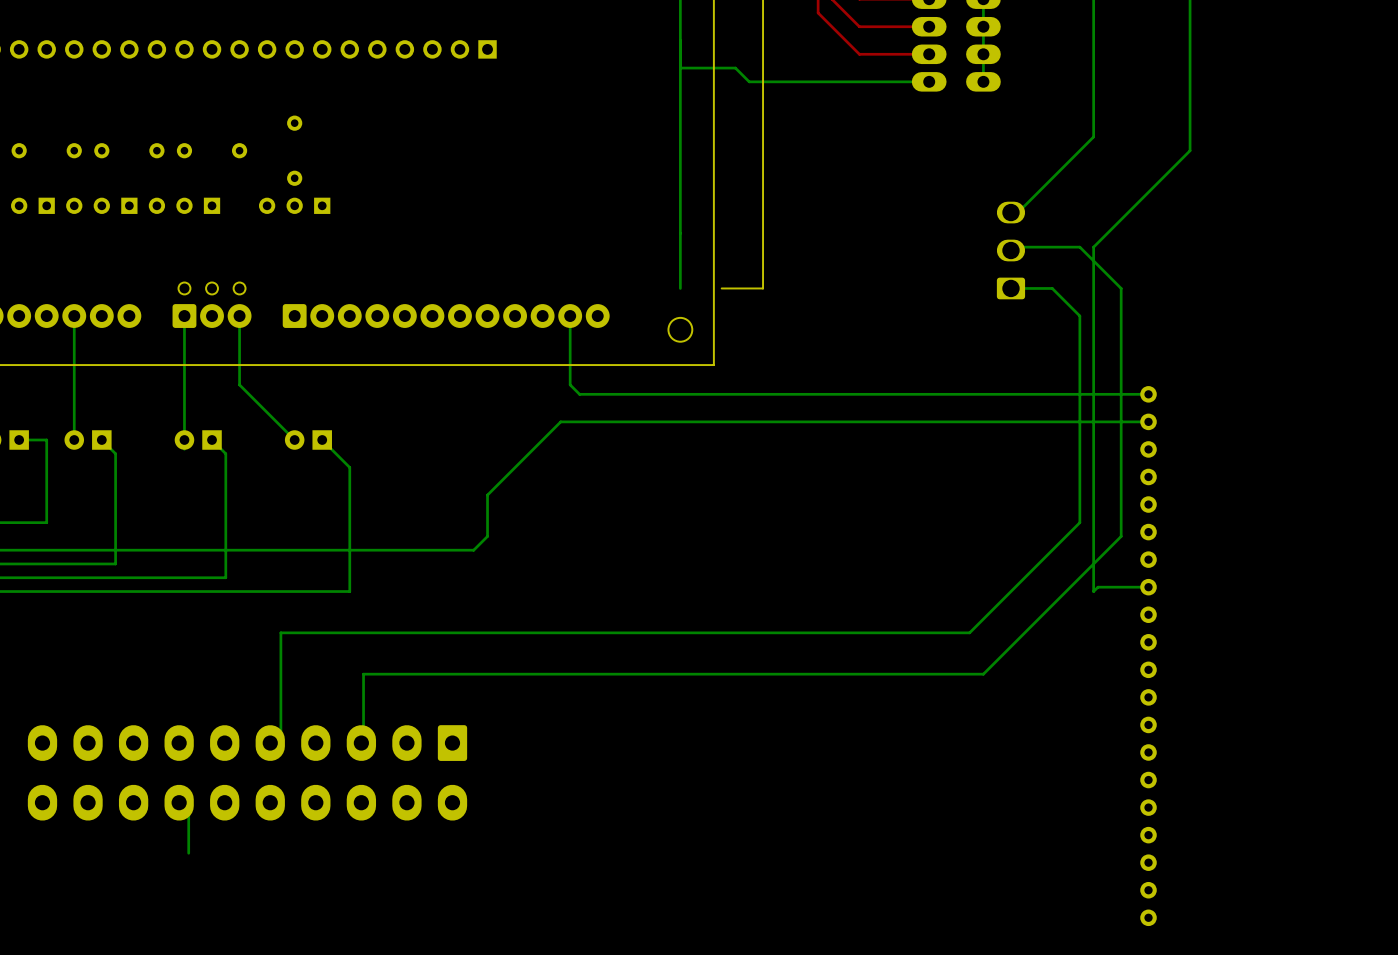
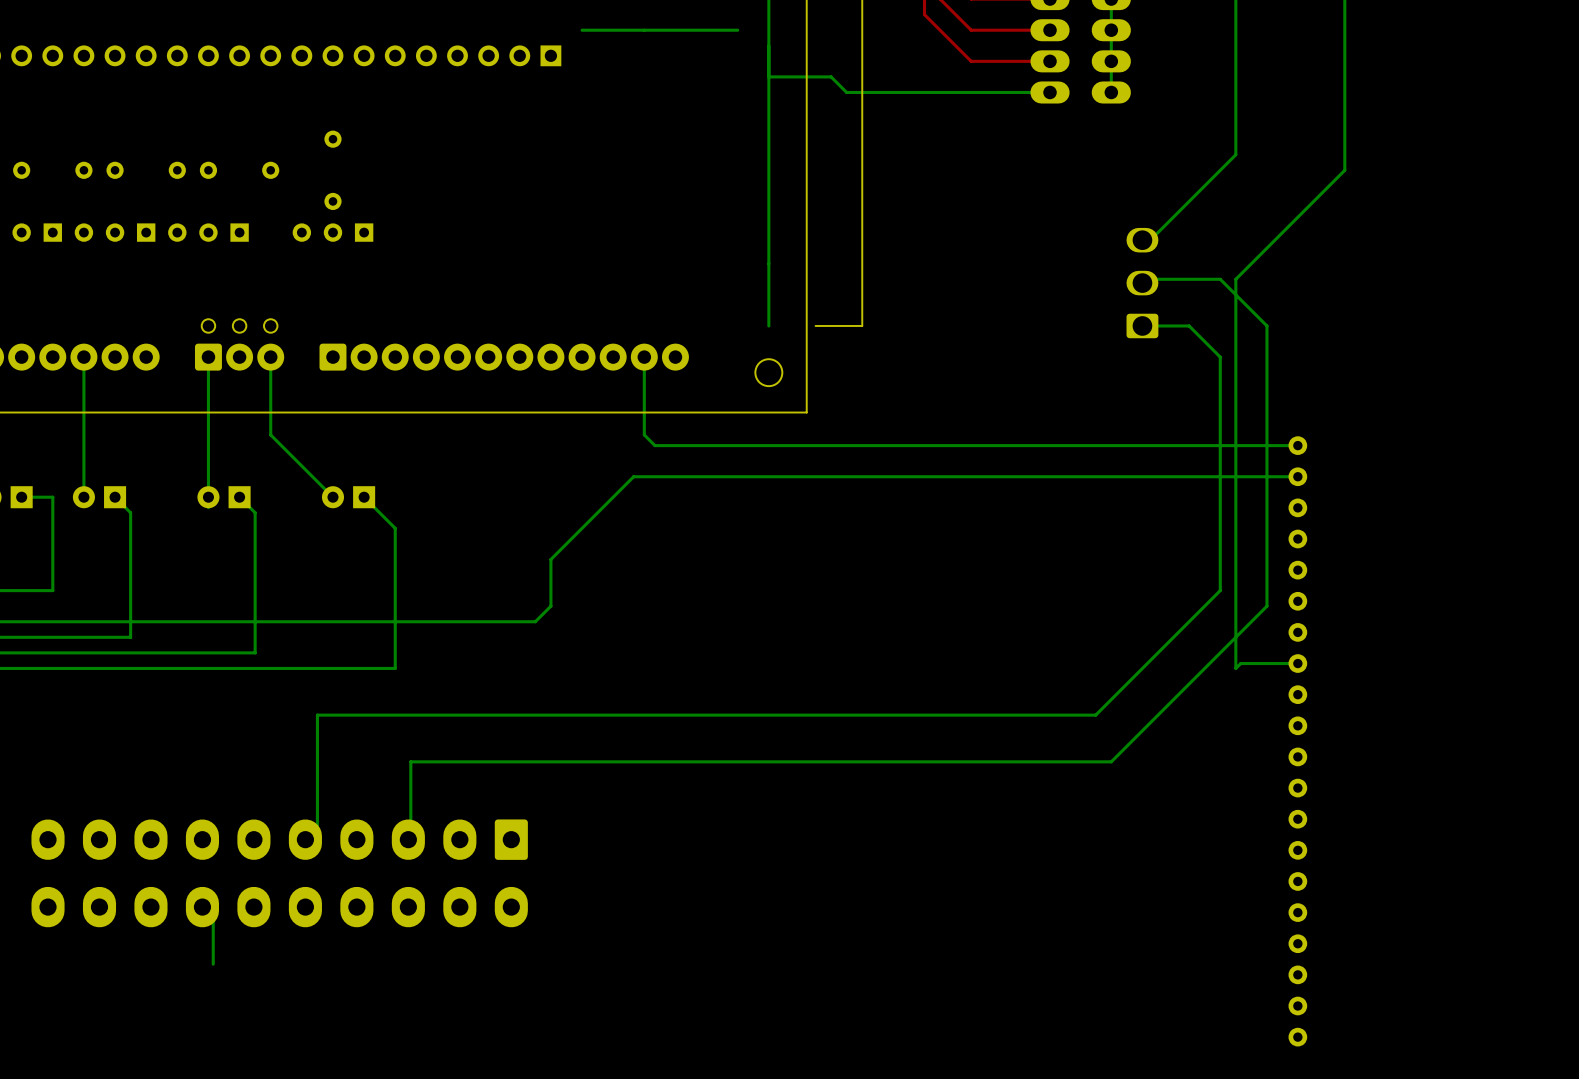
bottom track: none -> (737, 30) (582, 30)

